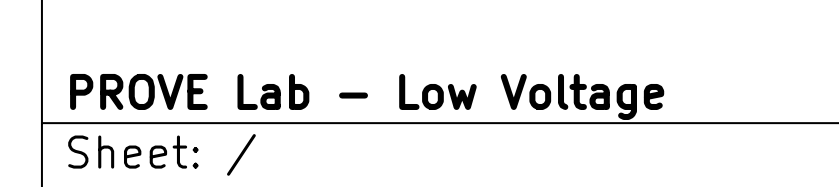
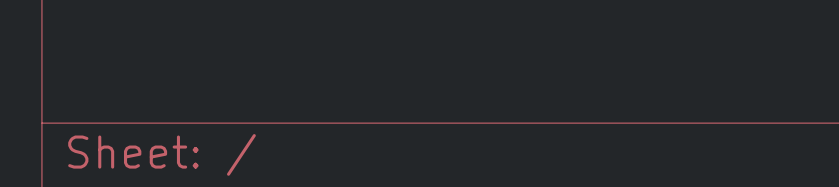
title block: PROVE Lab - Low Voltage (367, 96) -> none

